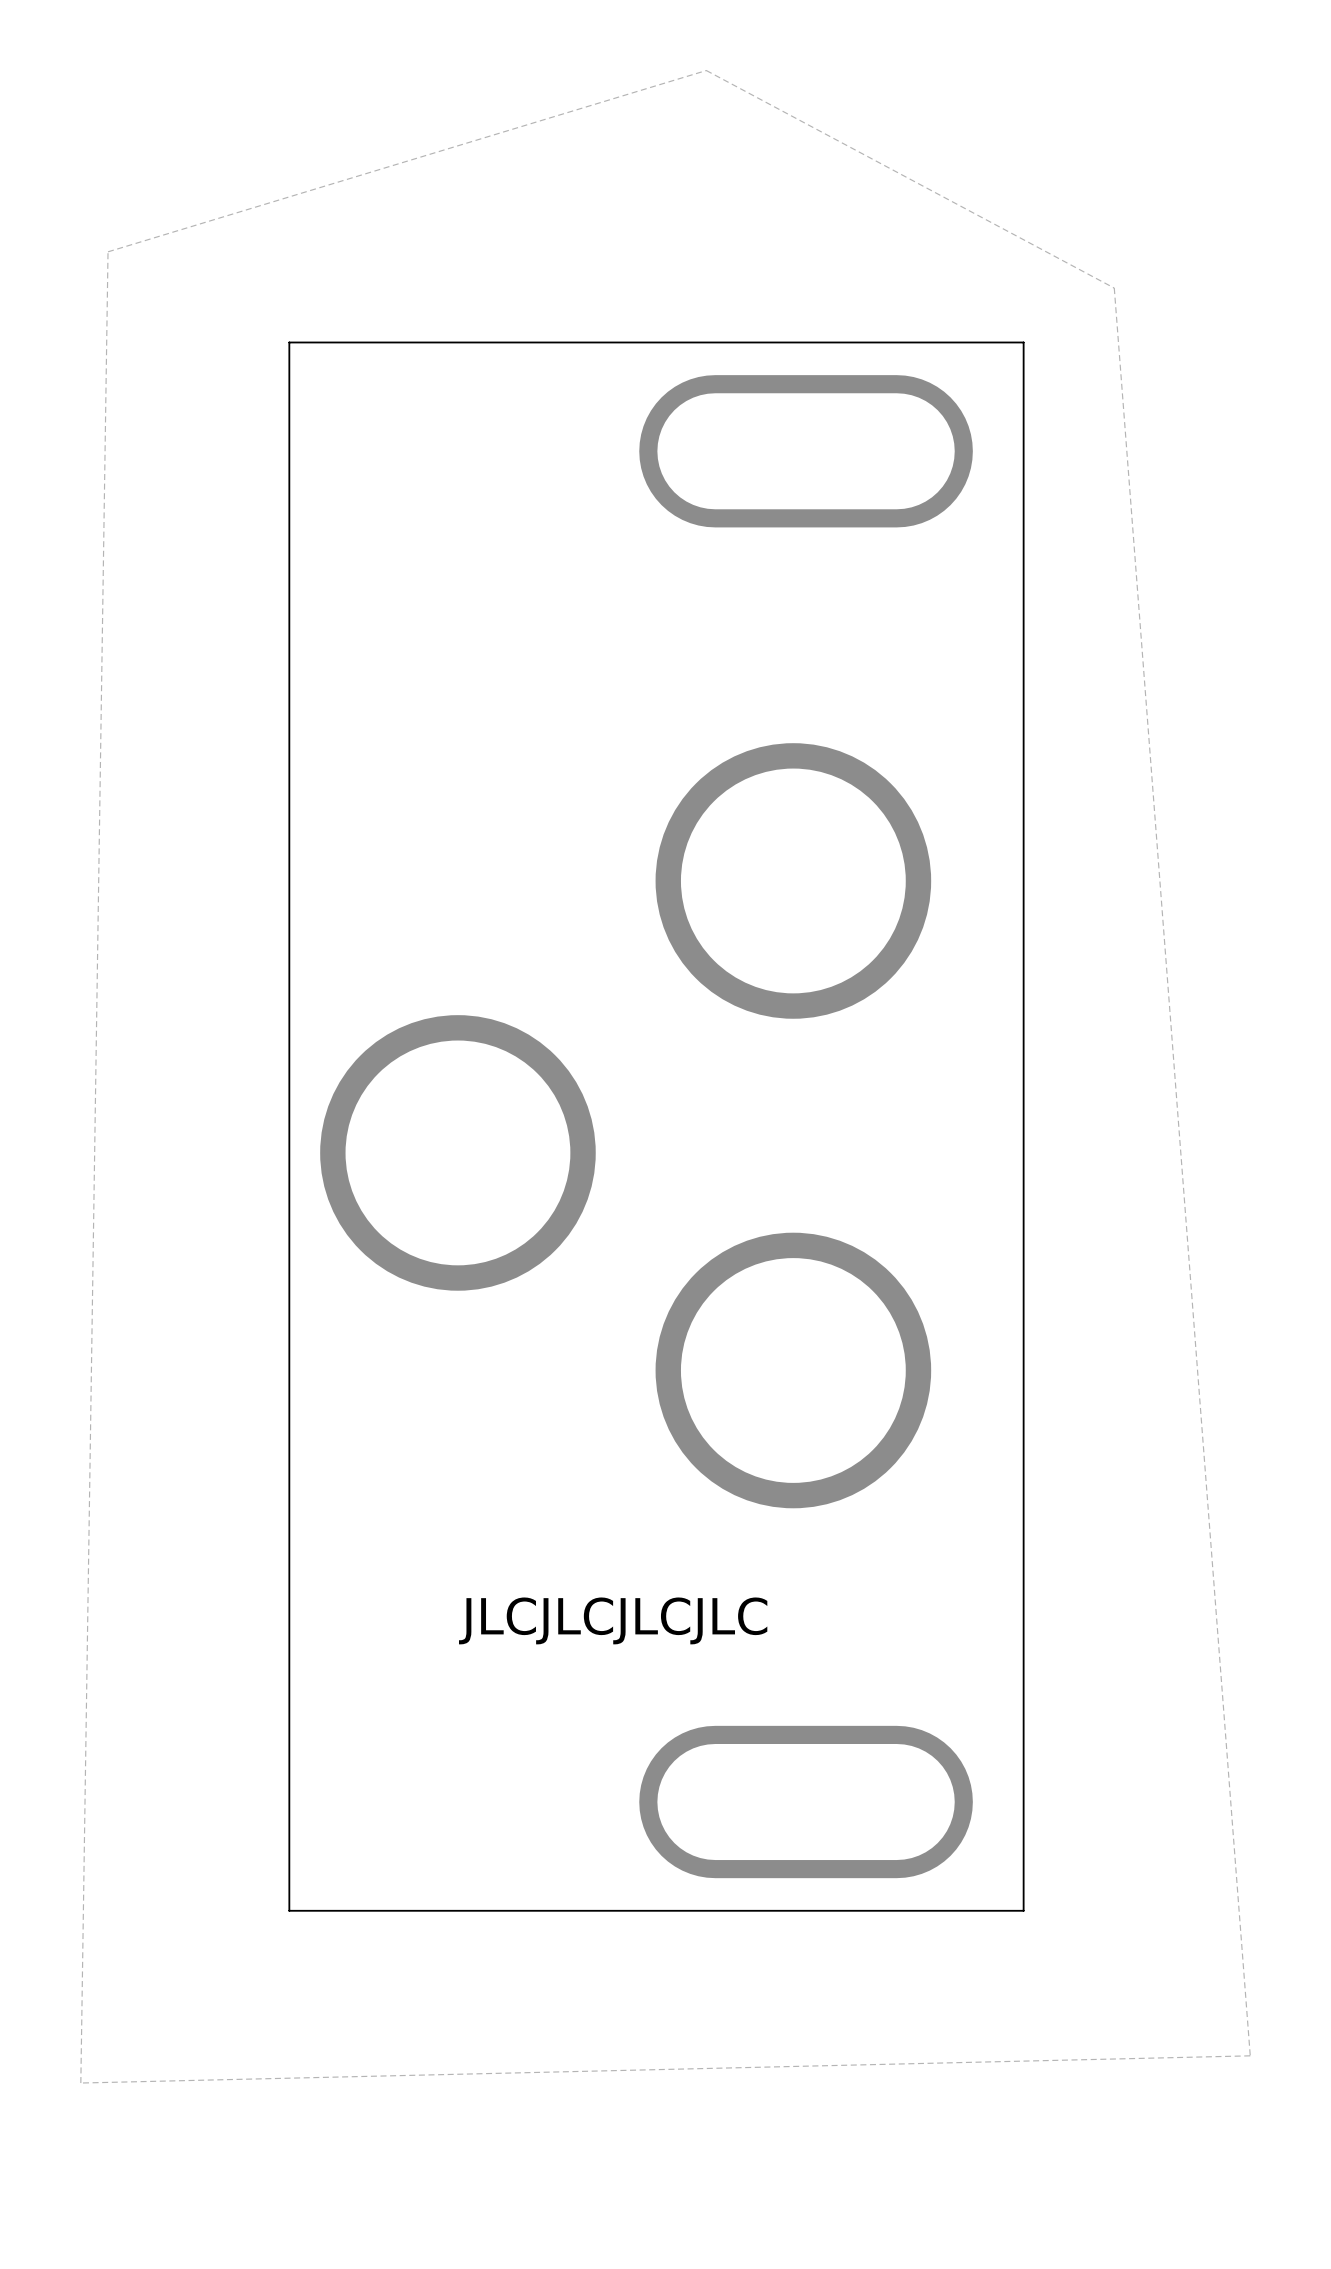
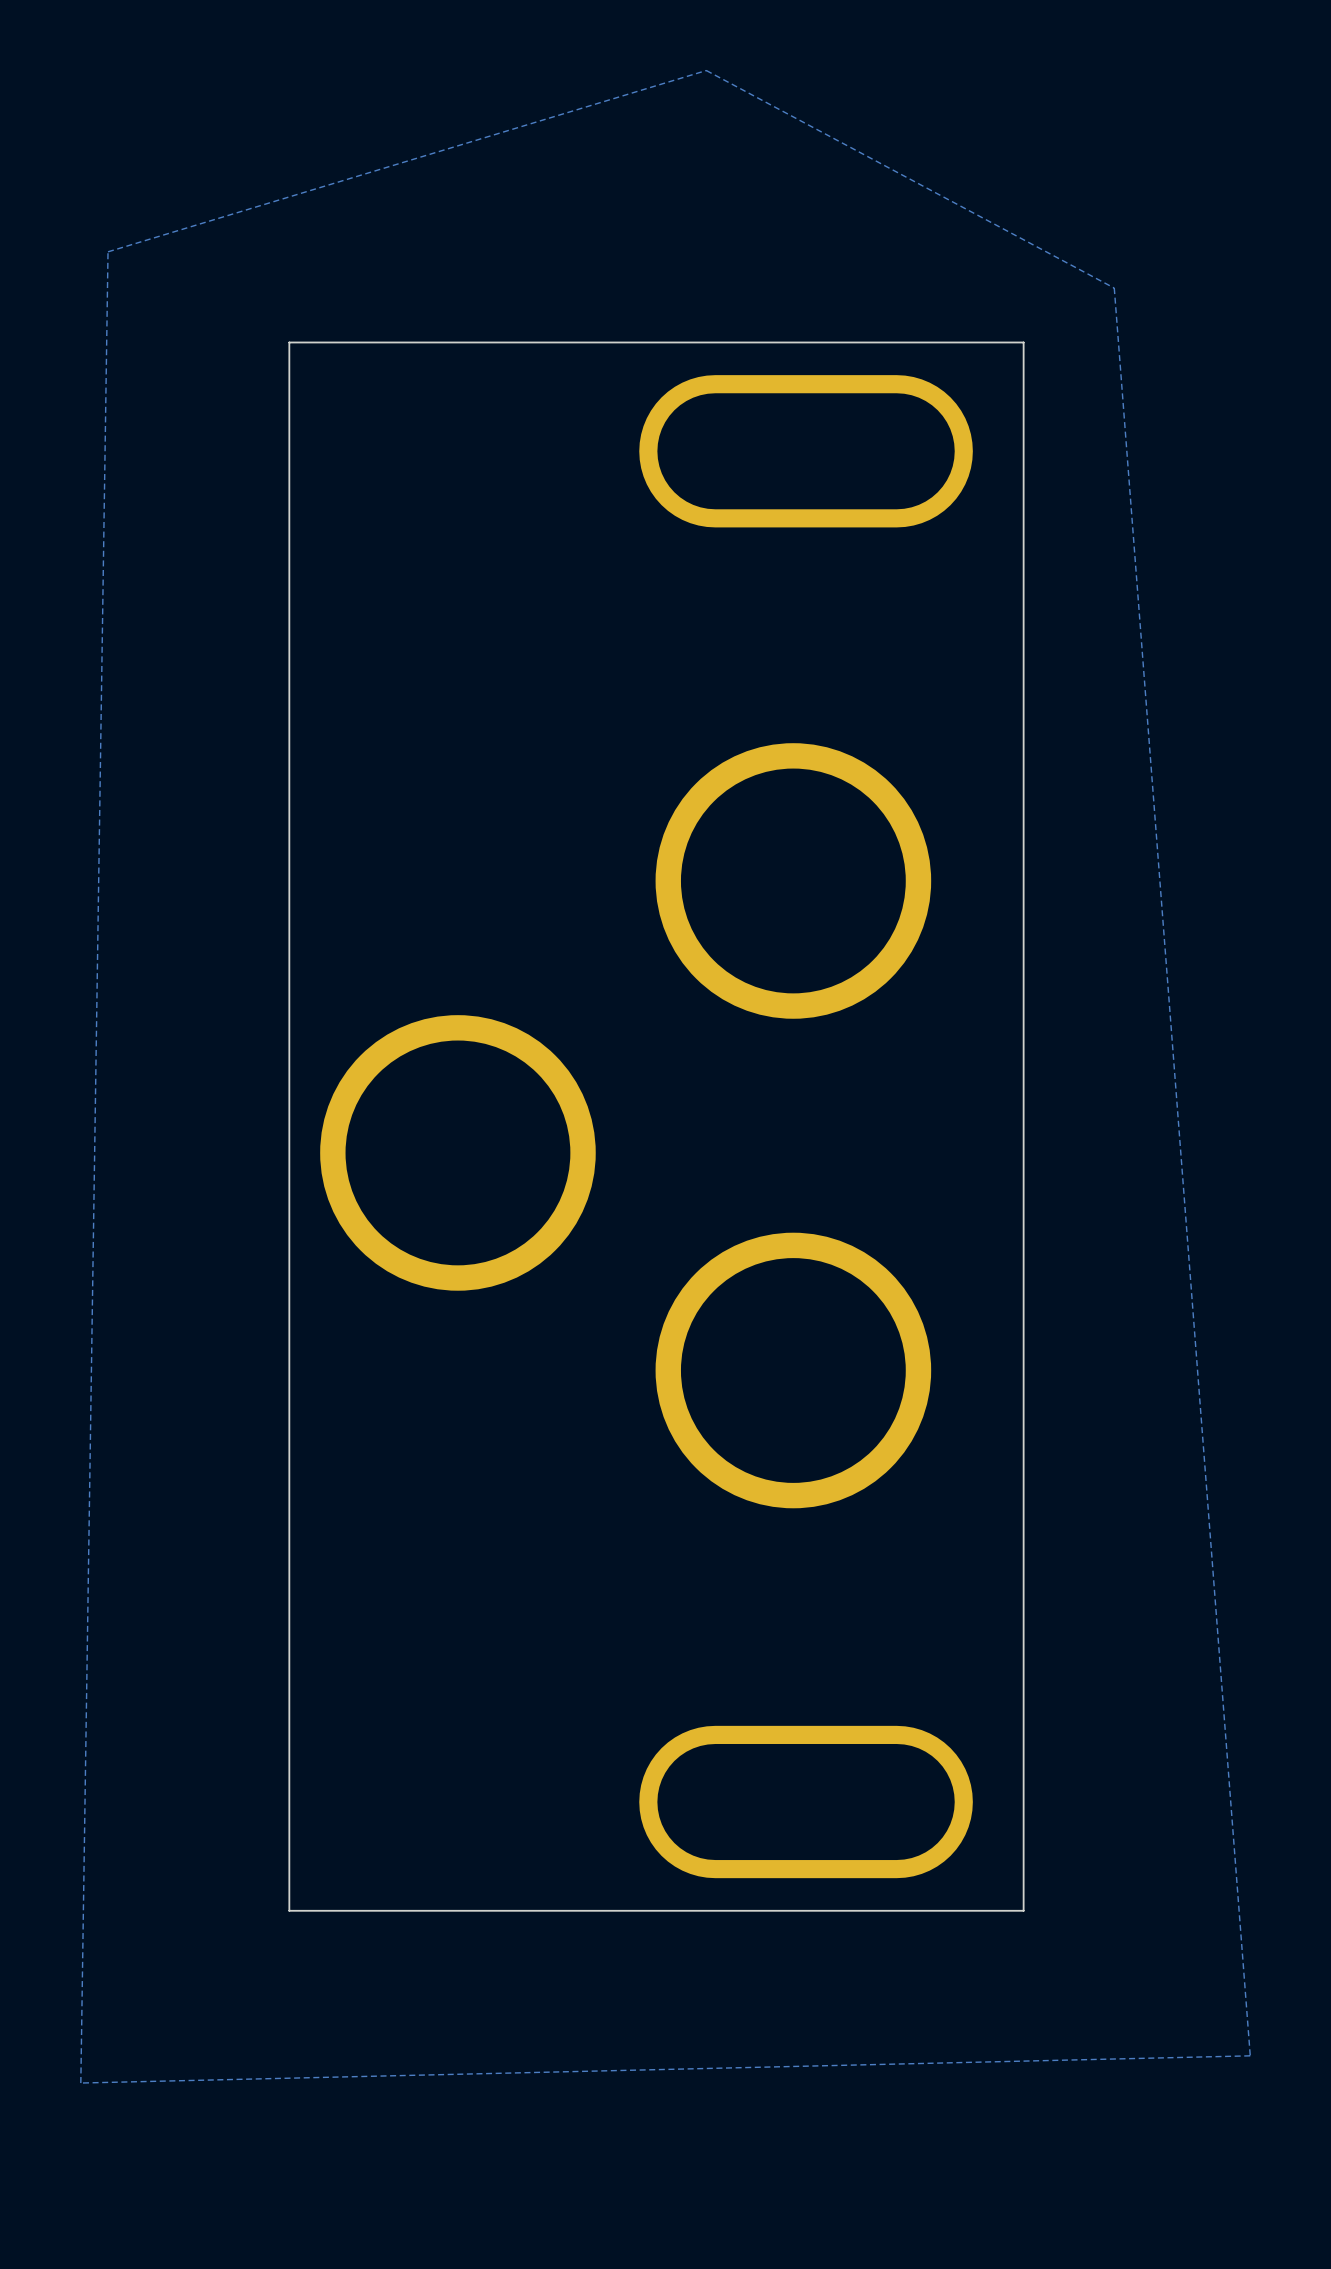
text: JLCJLCJLCJLC (613, 1620) -> none

